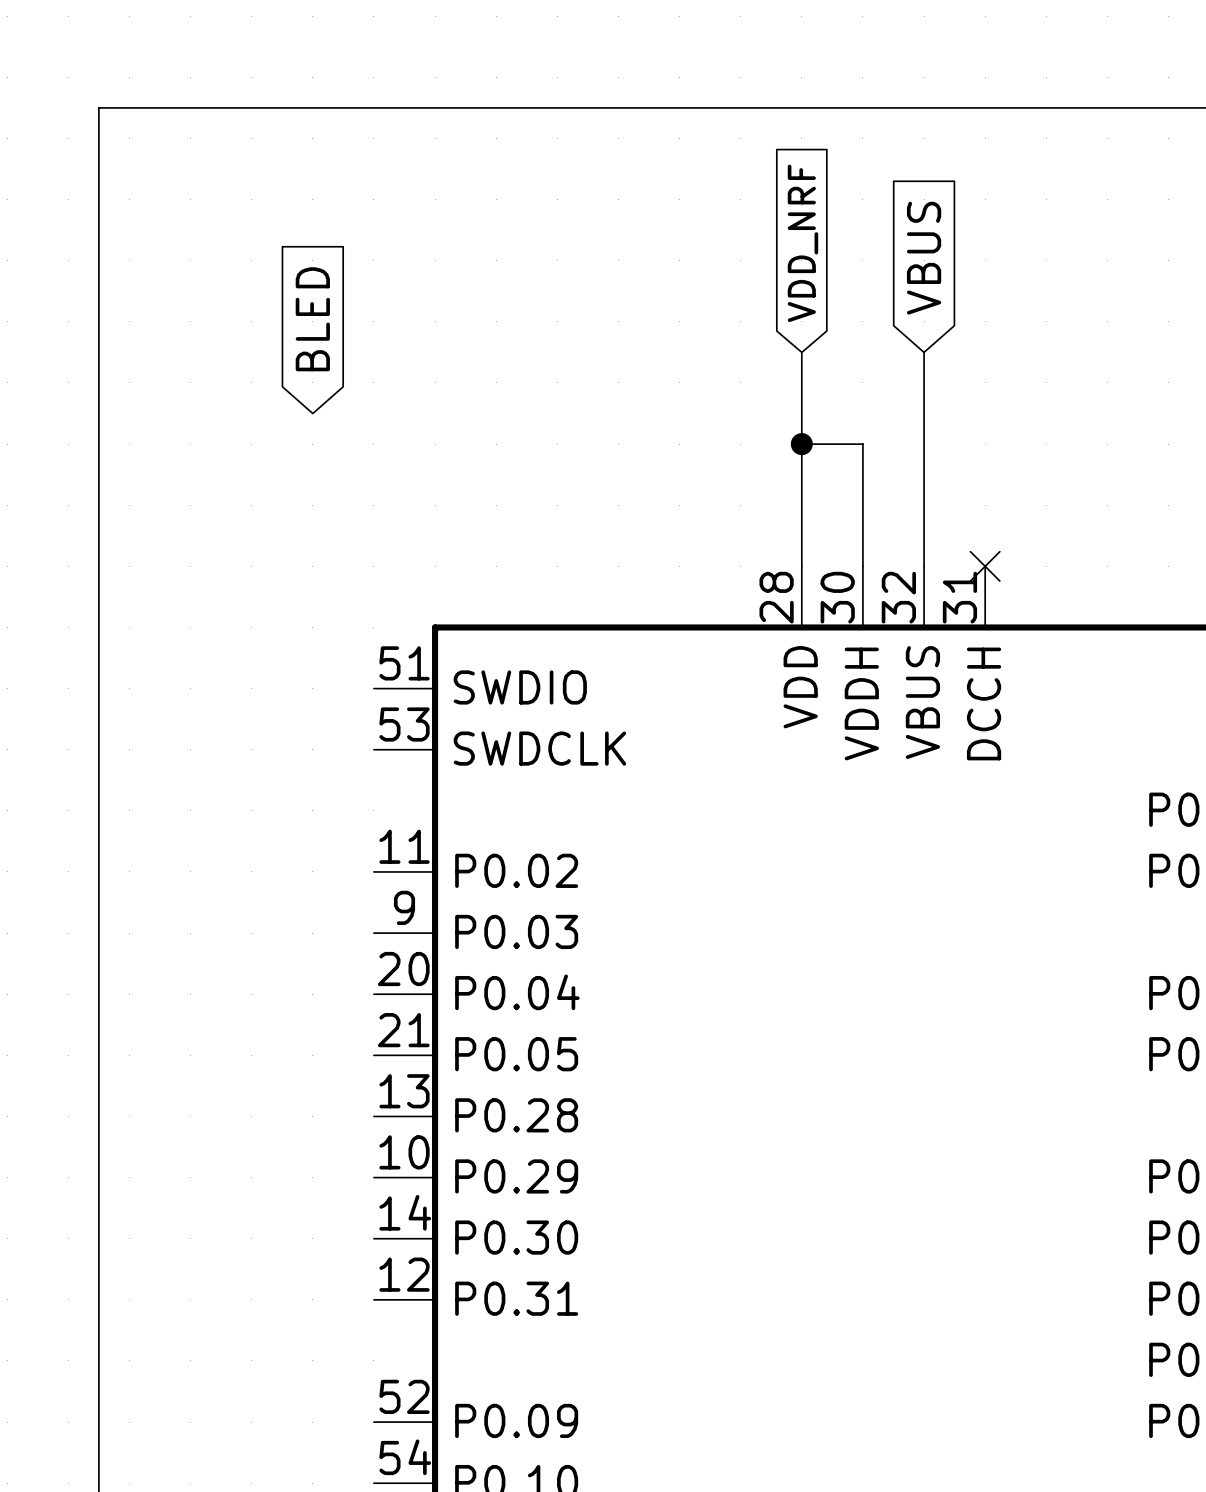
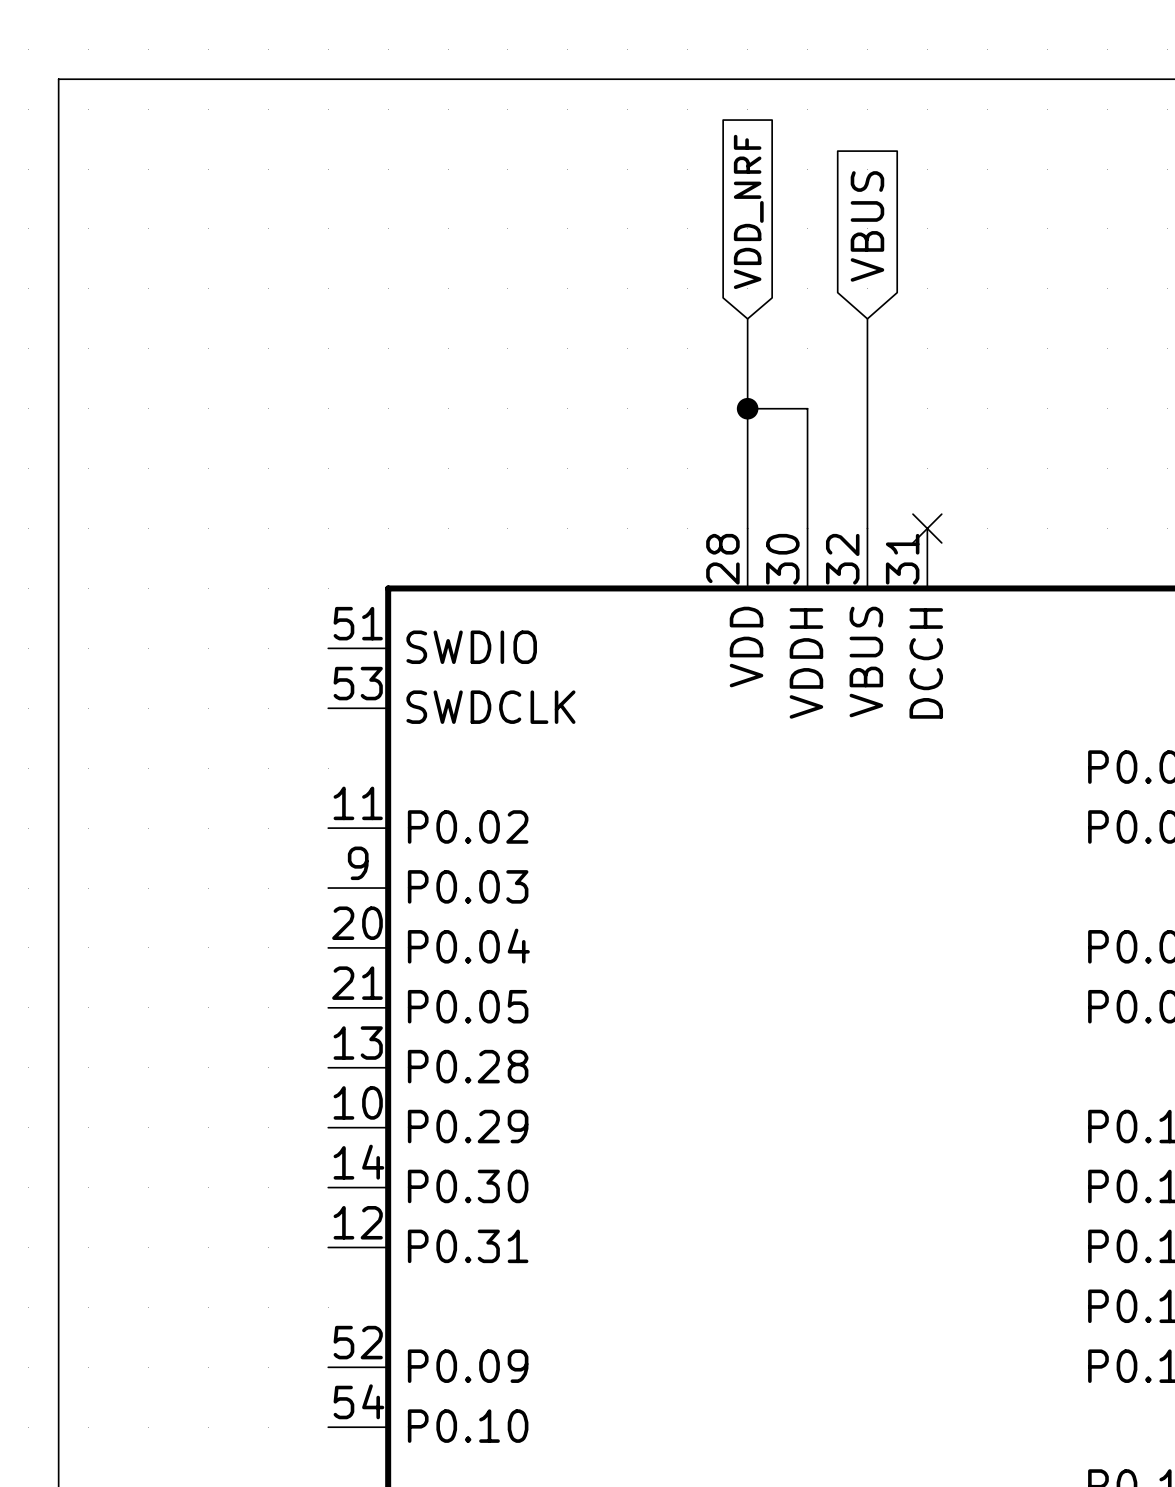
global label: BLED (312, 319) -> none

